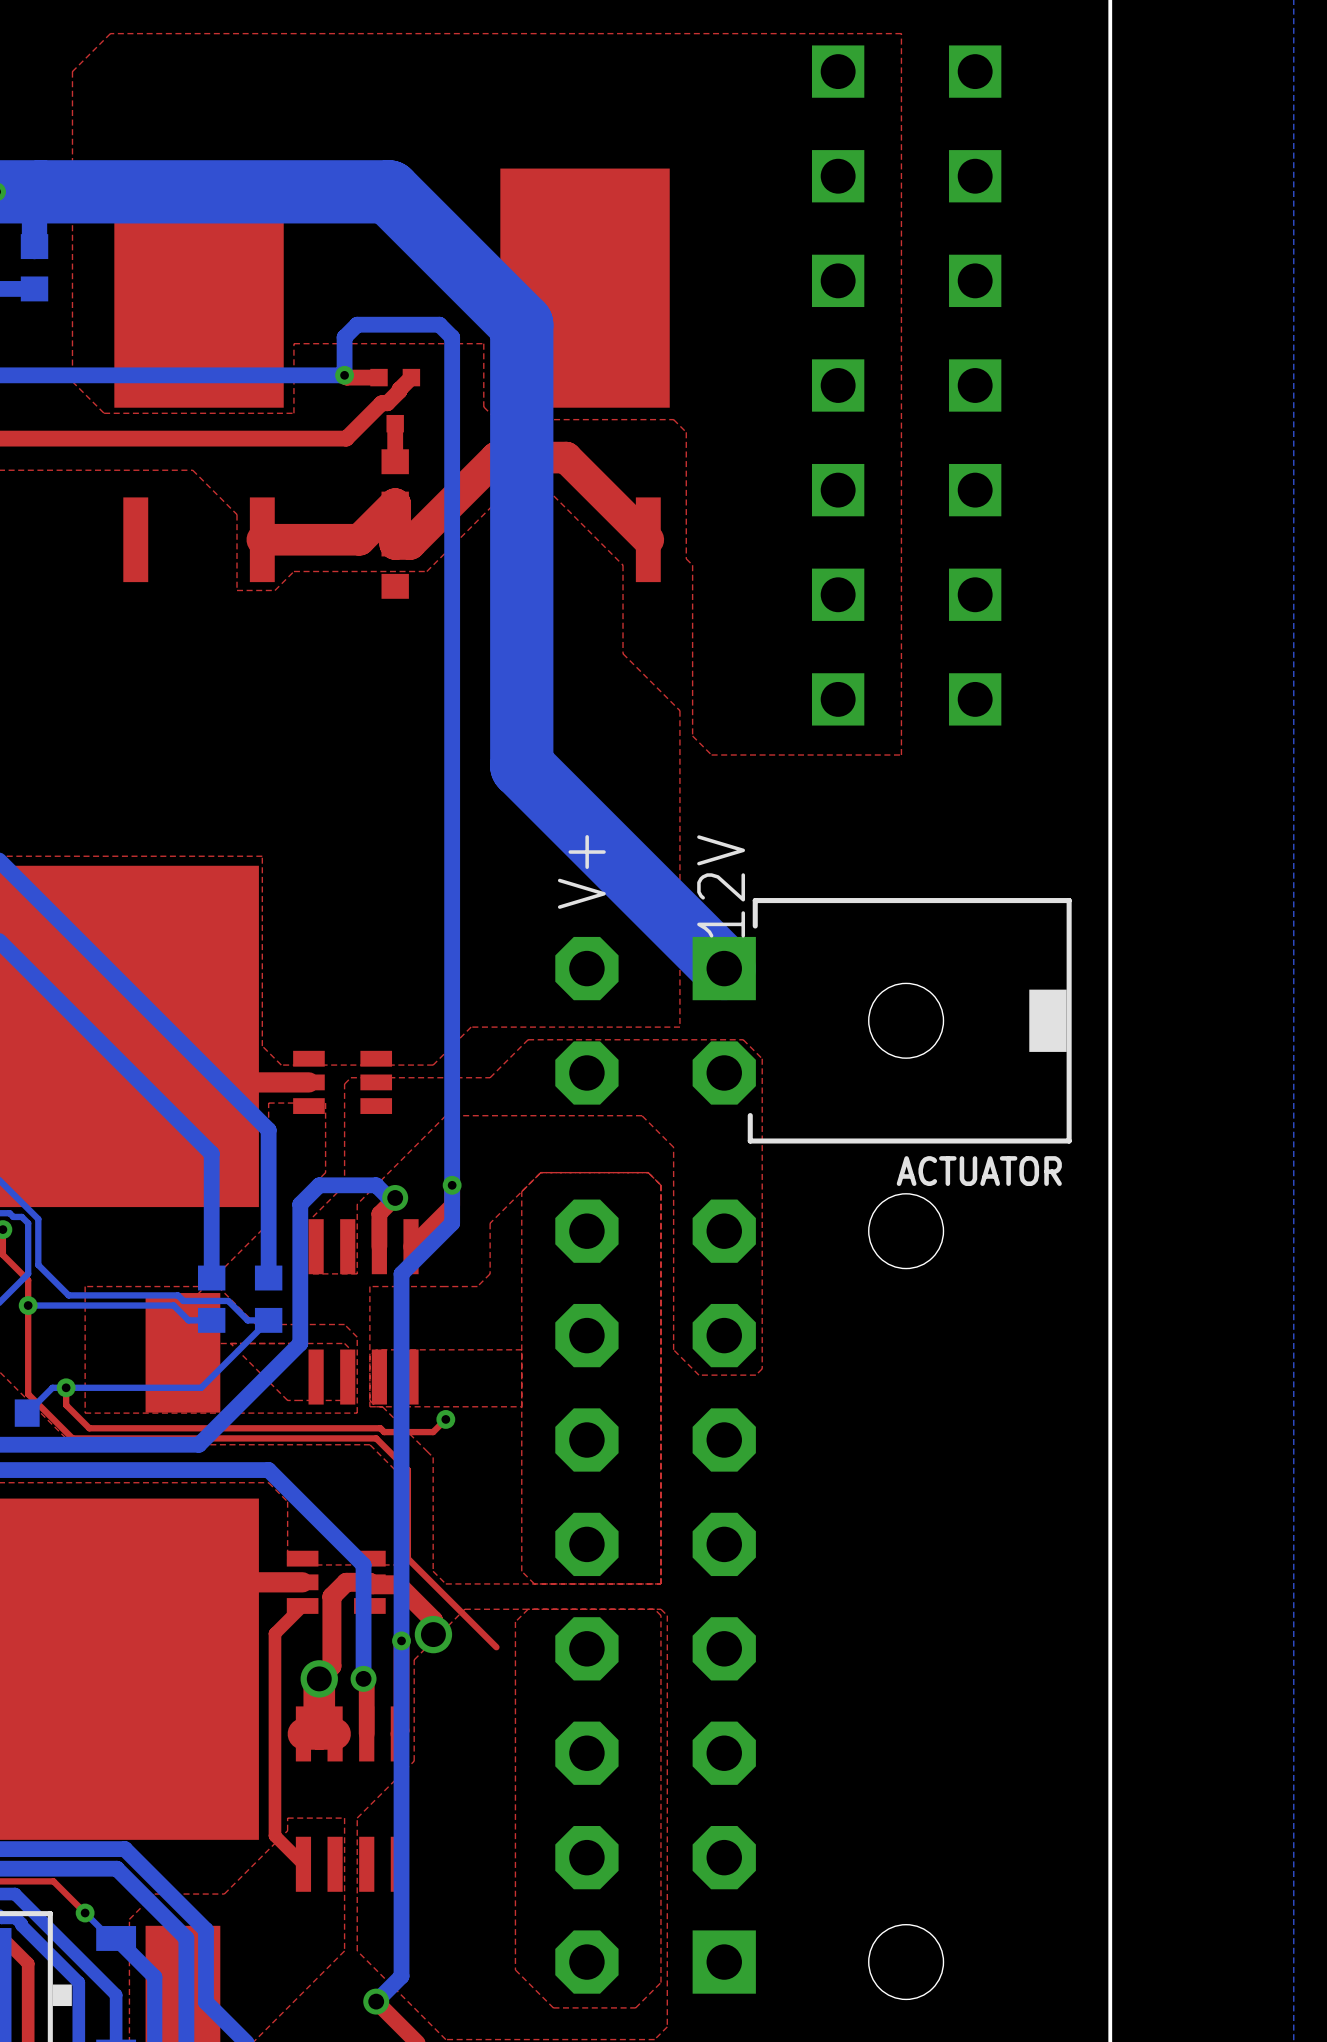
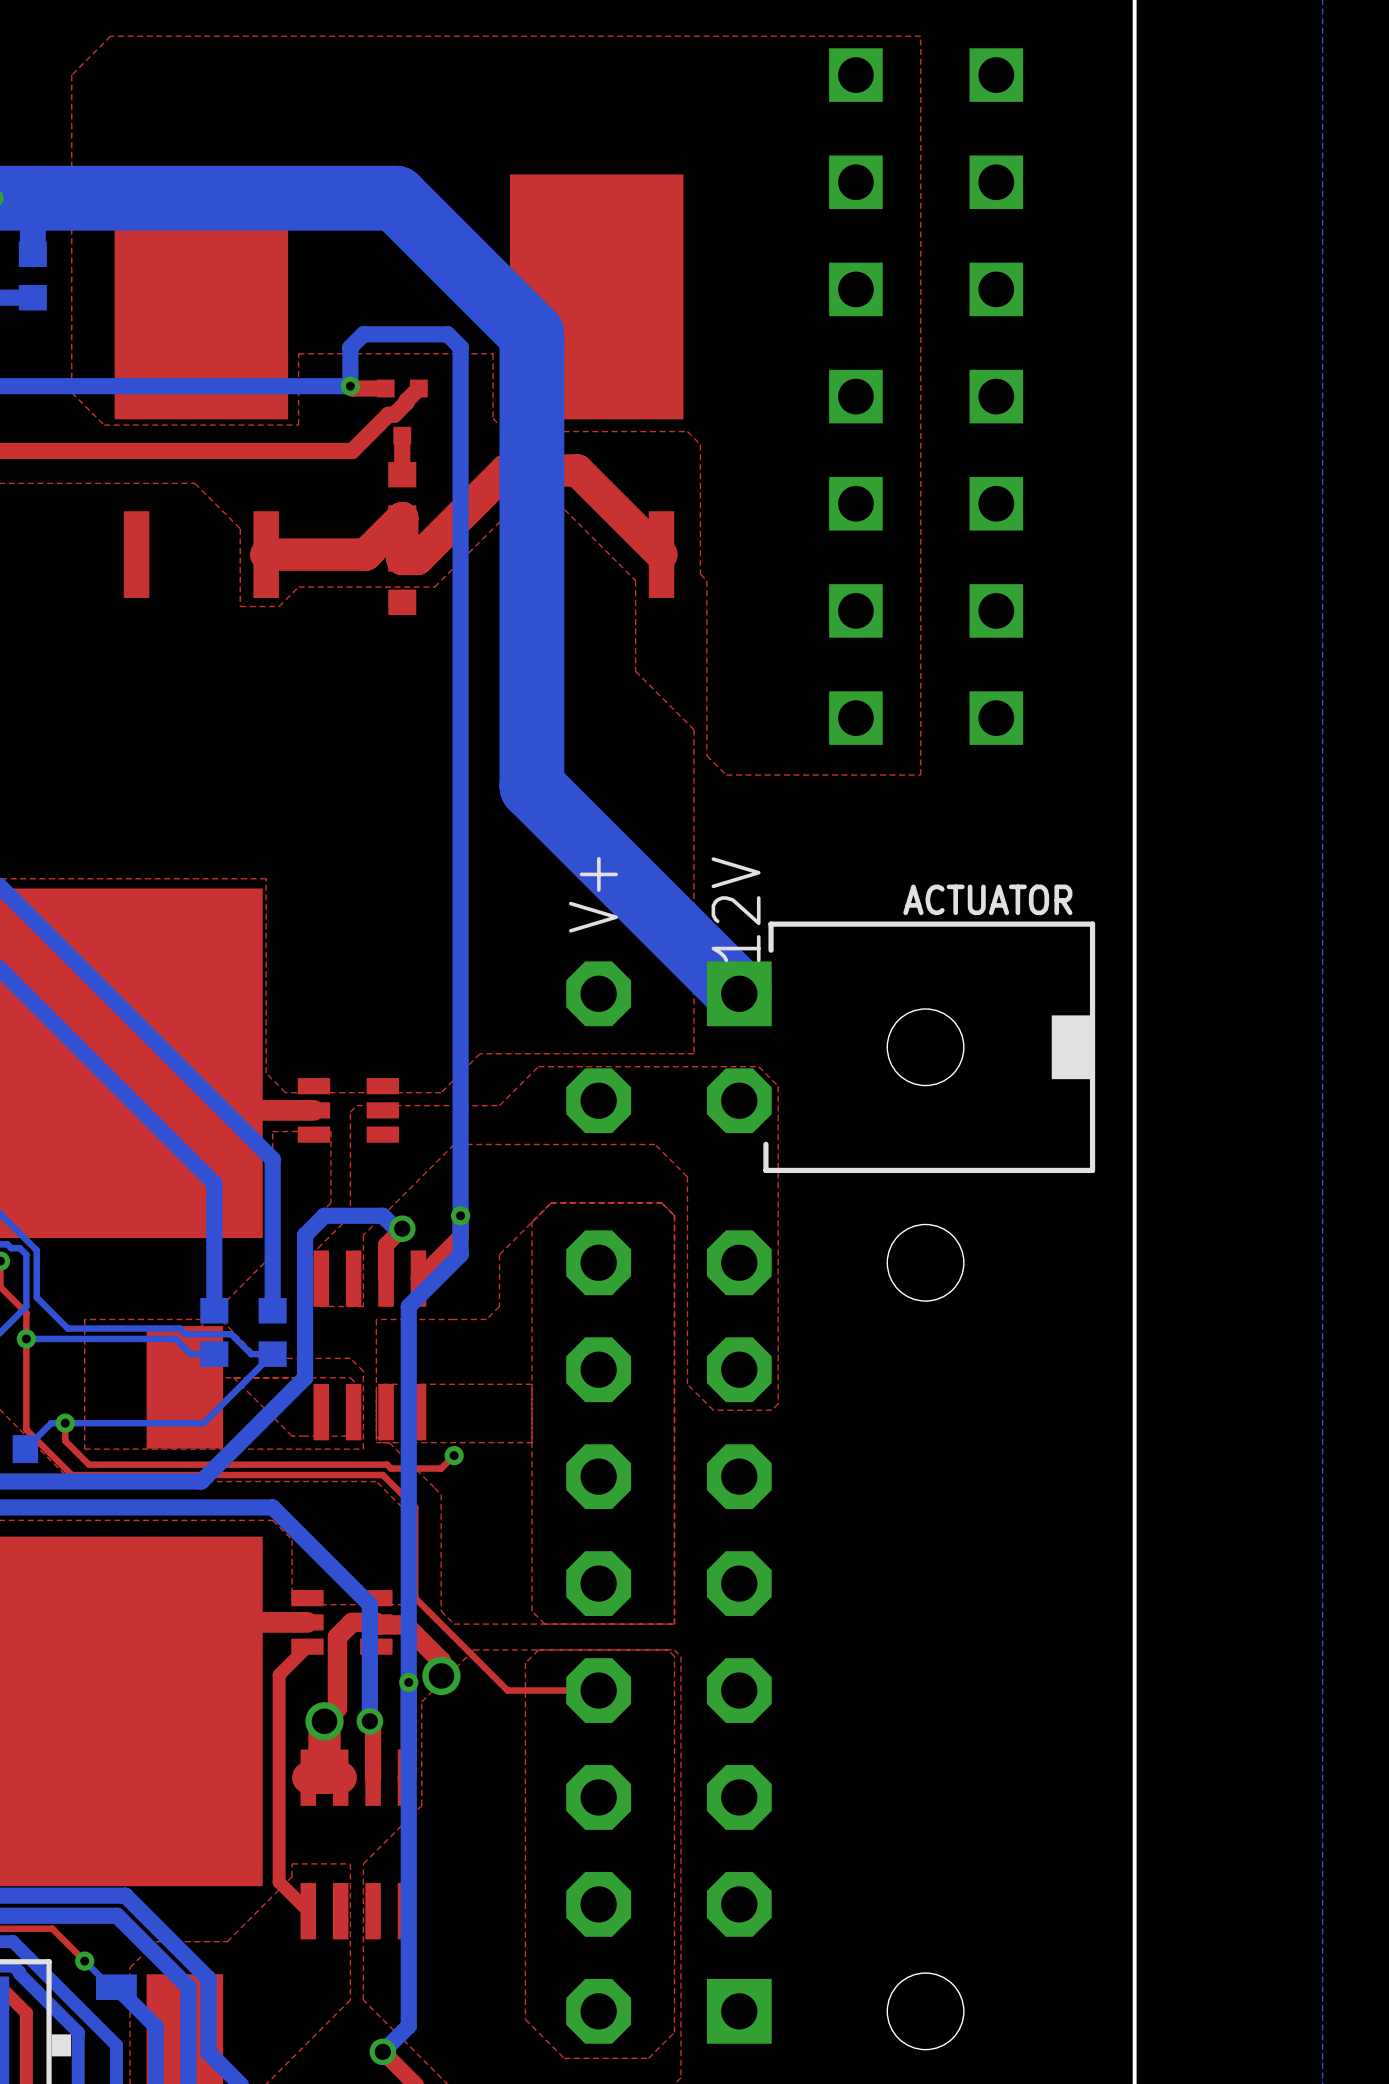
ACTUATOR name position: ACTUATOR (979, 1171) -> ACTUATOR (987, 899)
top track: none -> (505, 1688) (507, 1690) (598, 1690)

